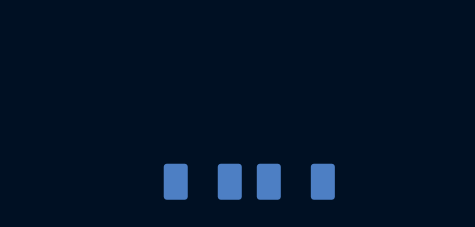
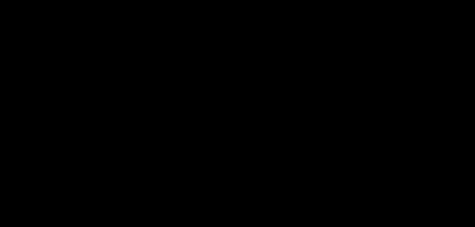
part: (202, 181) -> none
part: (295, 181) -> none

